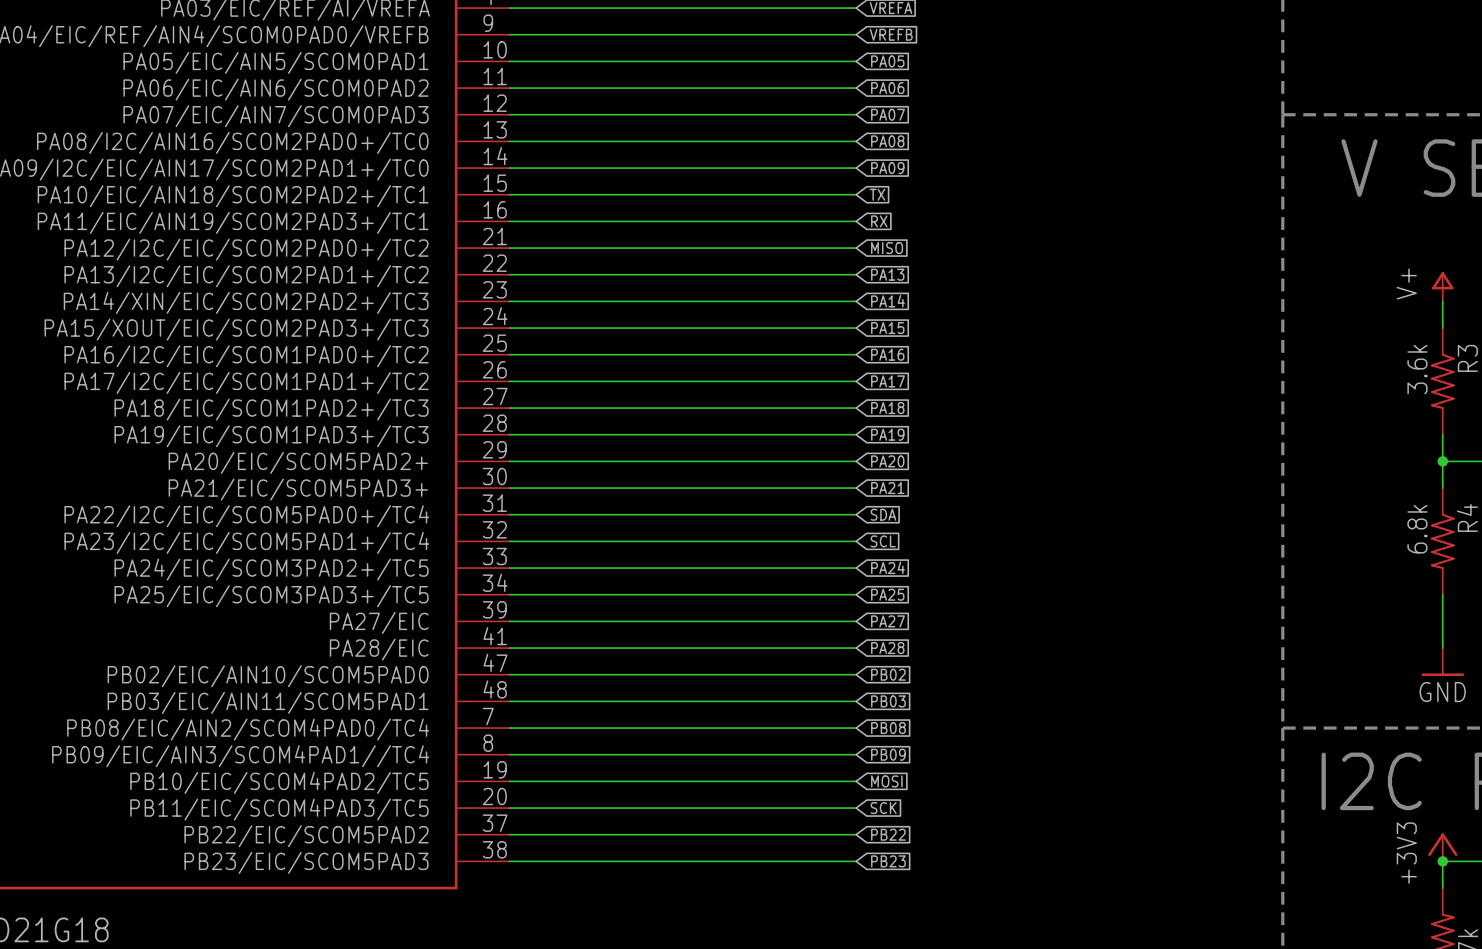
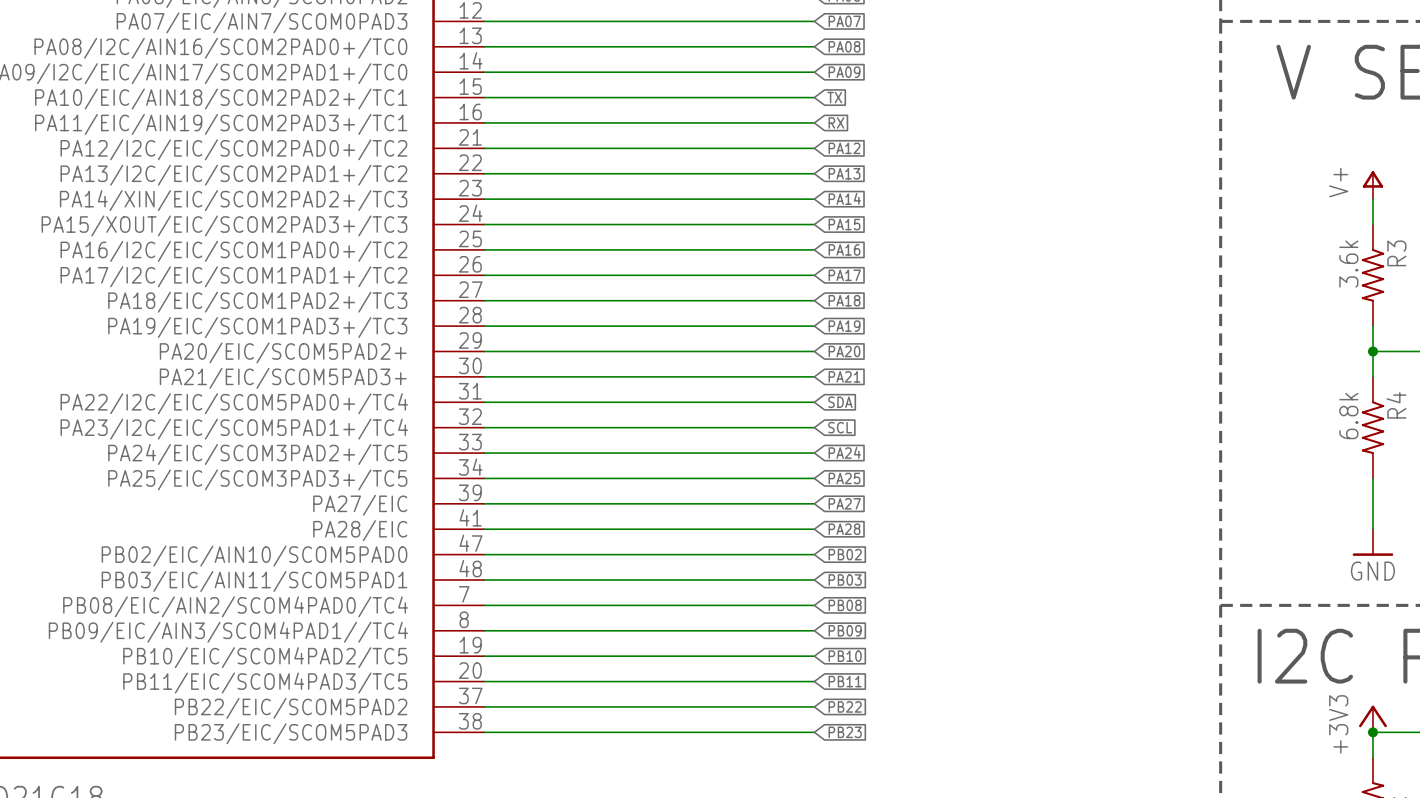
global label: MISO (887, 248) -> PA12 (844, 148)
global label: MOSI (886, 781) -> PB10 (845, 656)
global label: SCK (883, 808) -> PB11 (845, 681)

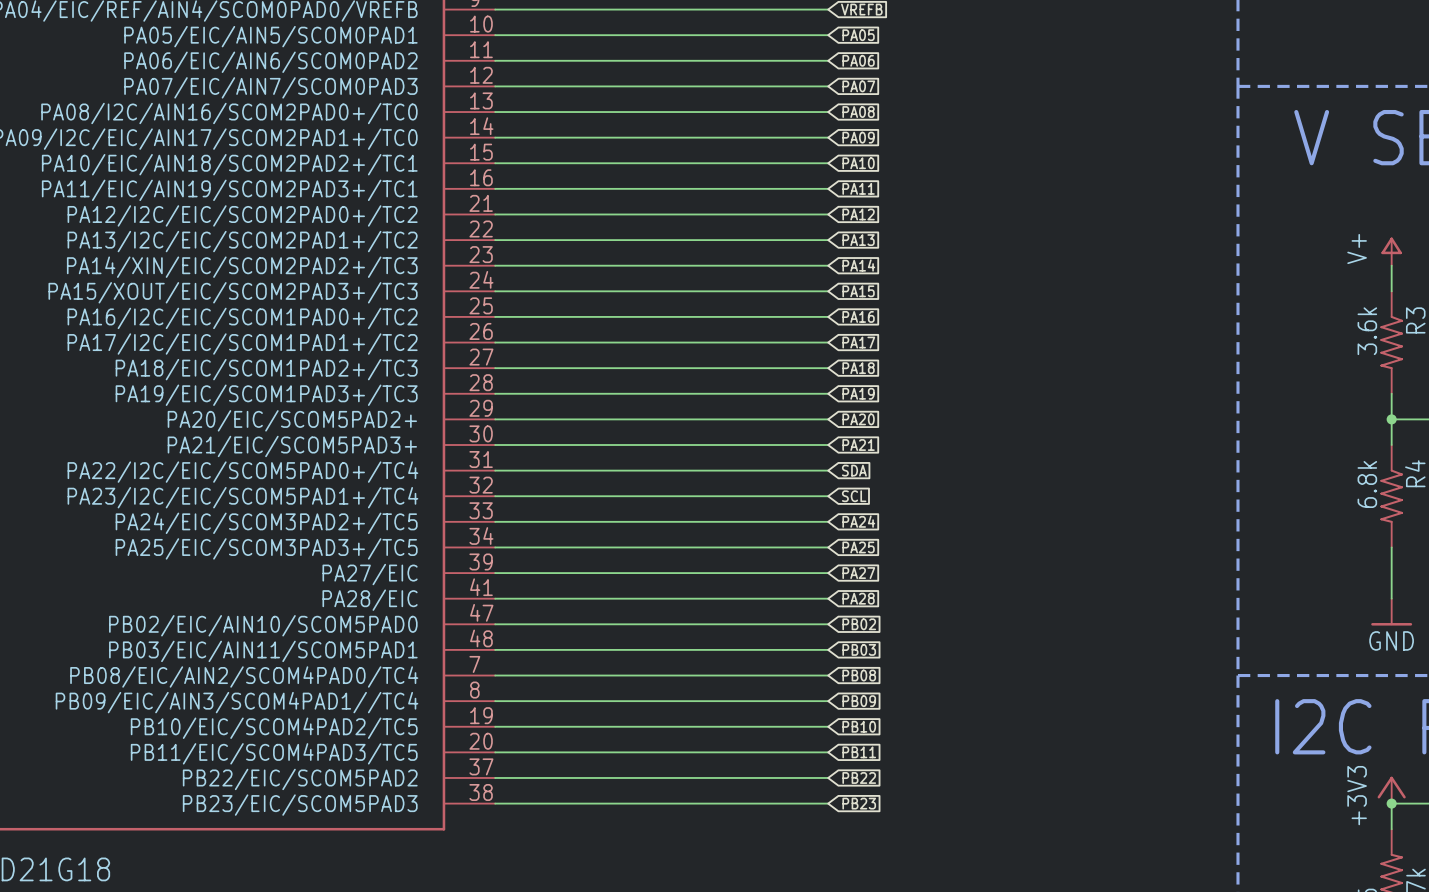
global label: TX (834, 97) -> PA10 (858, 163)
global label: RX (836, 122) -> PA11 (858, 188)

